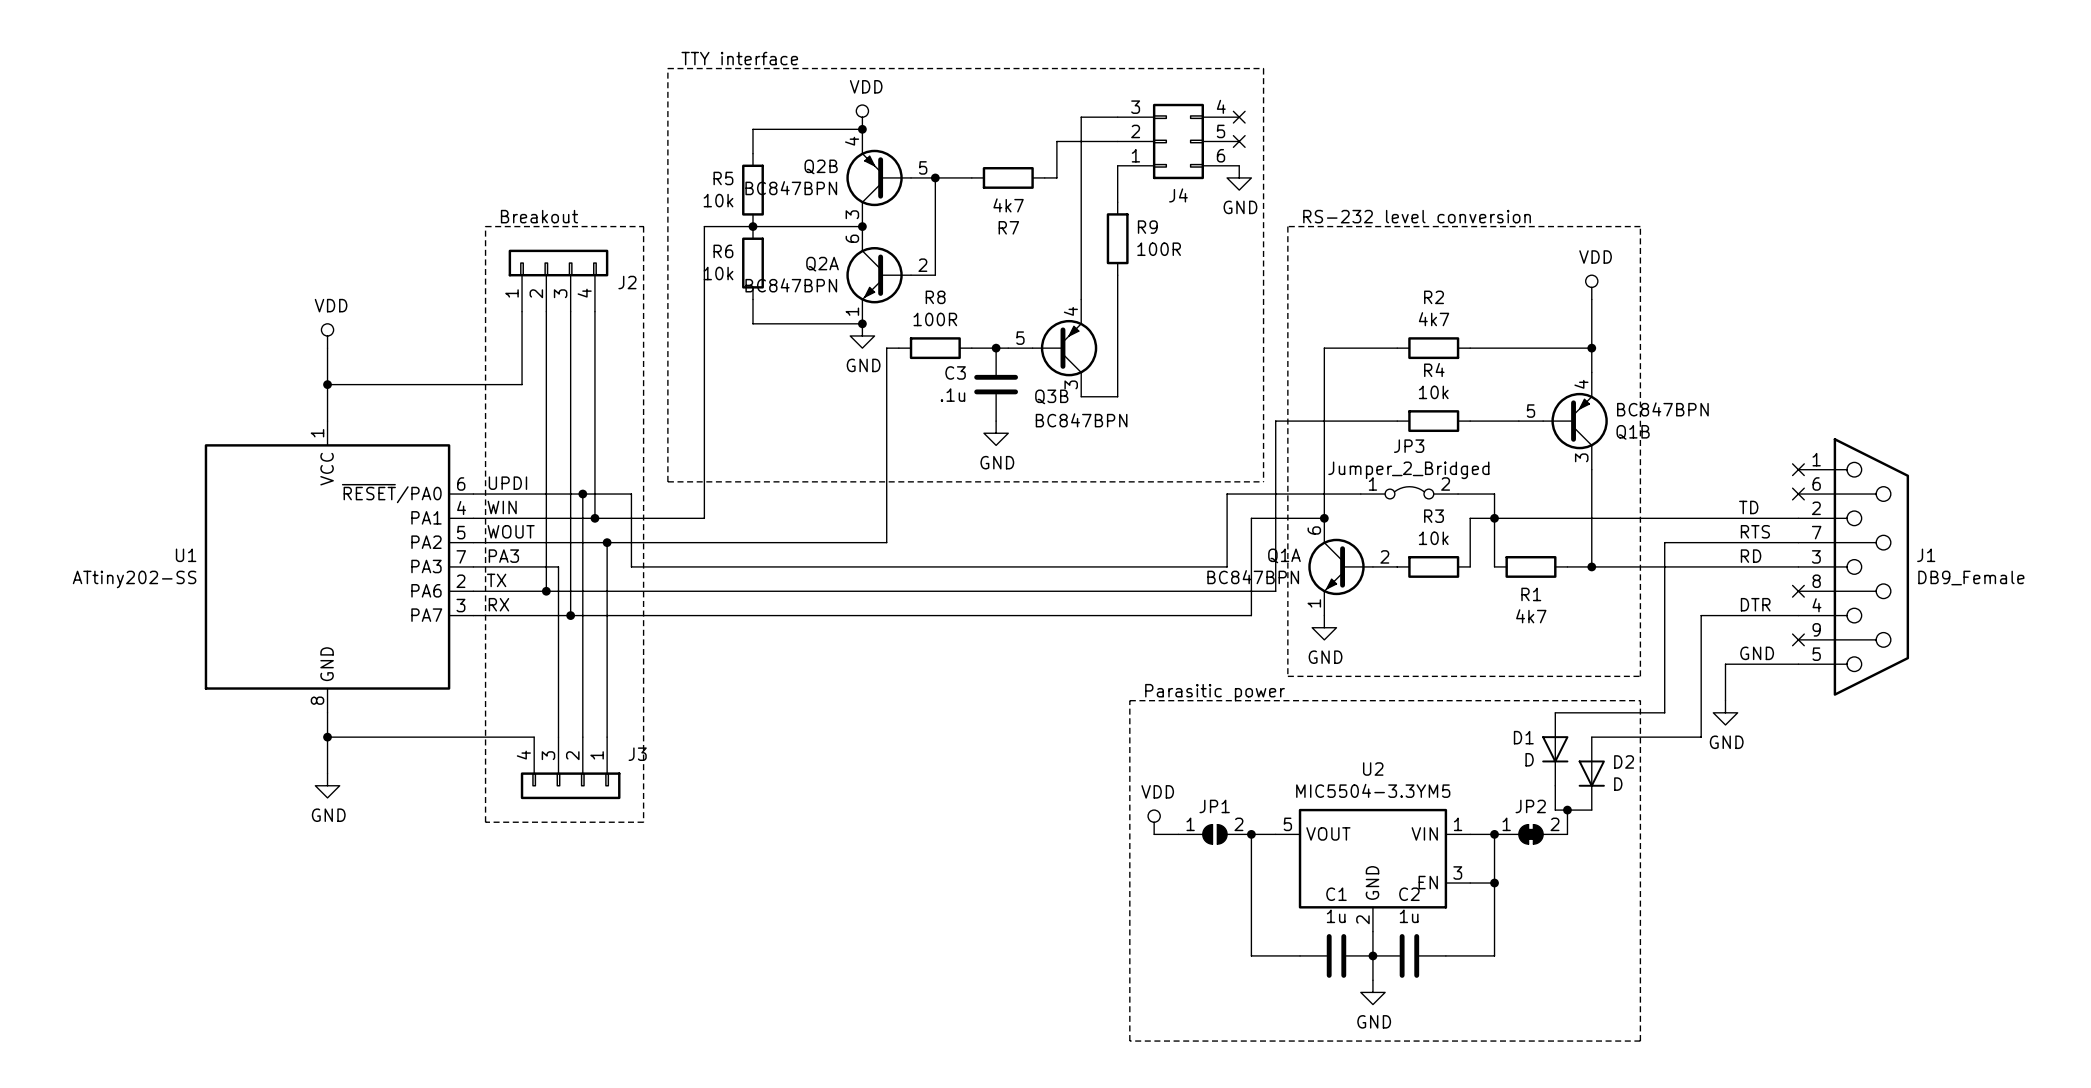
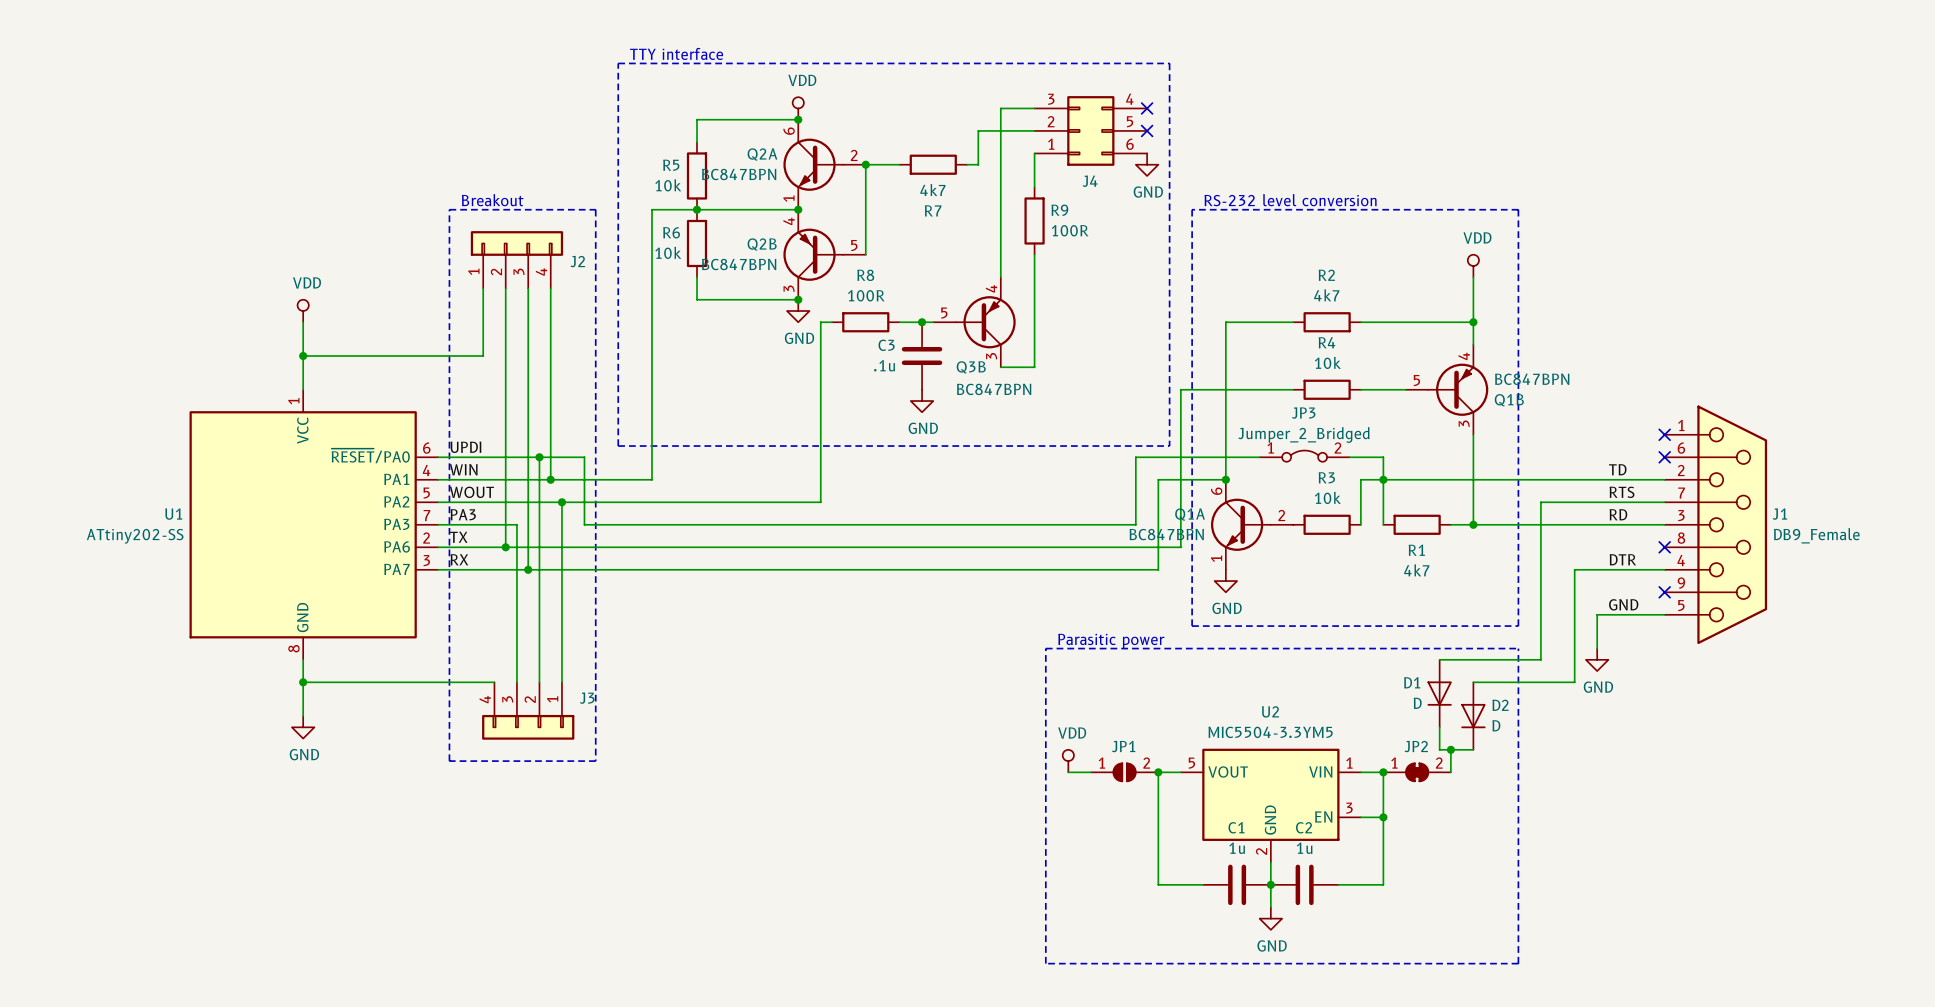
Q2B position: (890, 177) -> (824, 254)
Q2A position: (890, 275) -> (824, 164)

